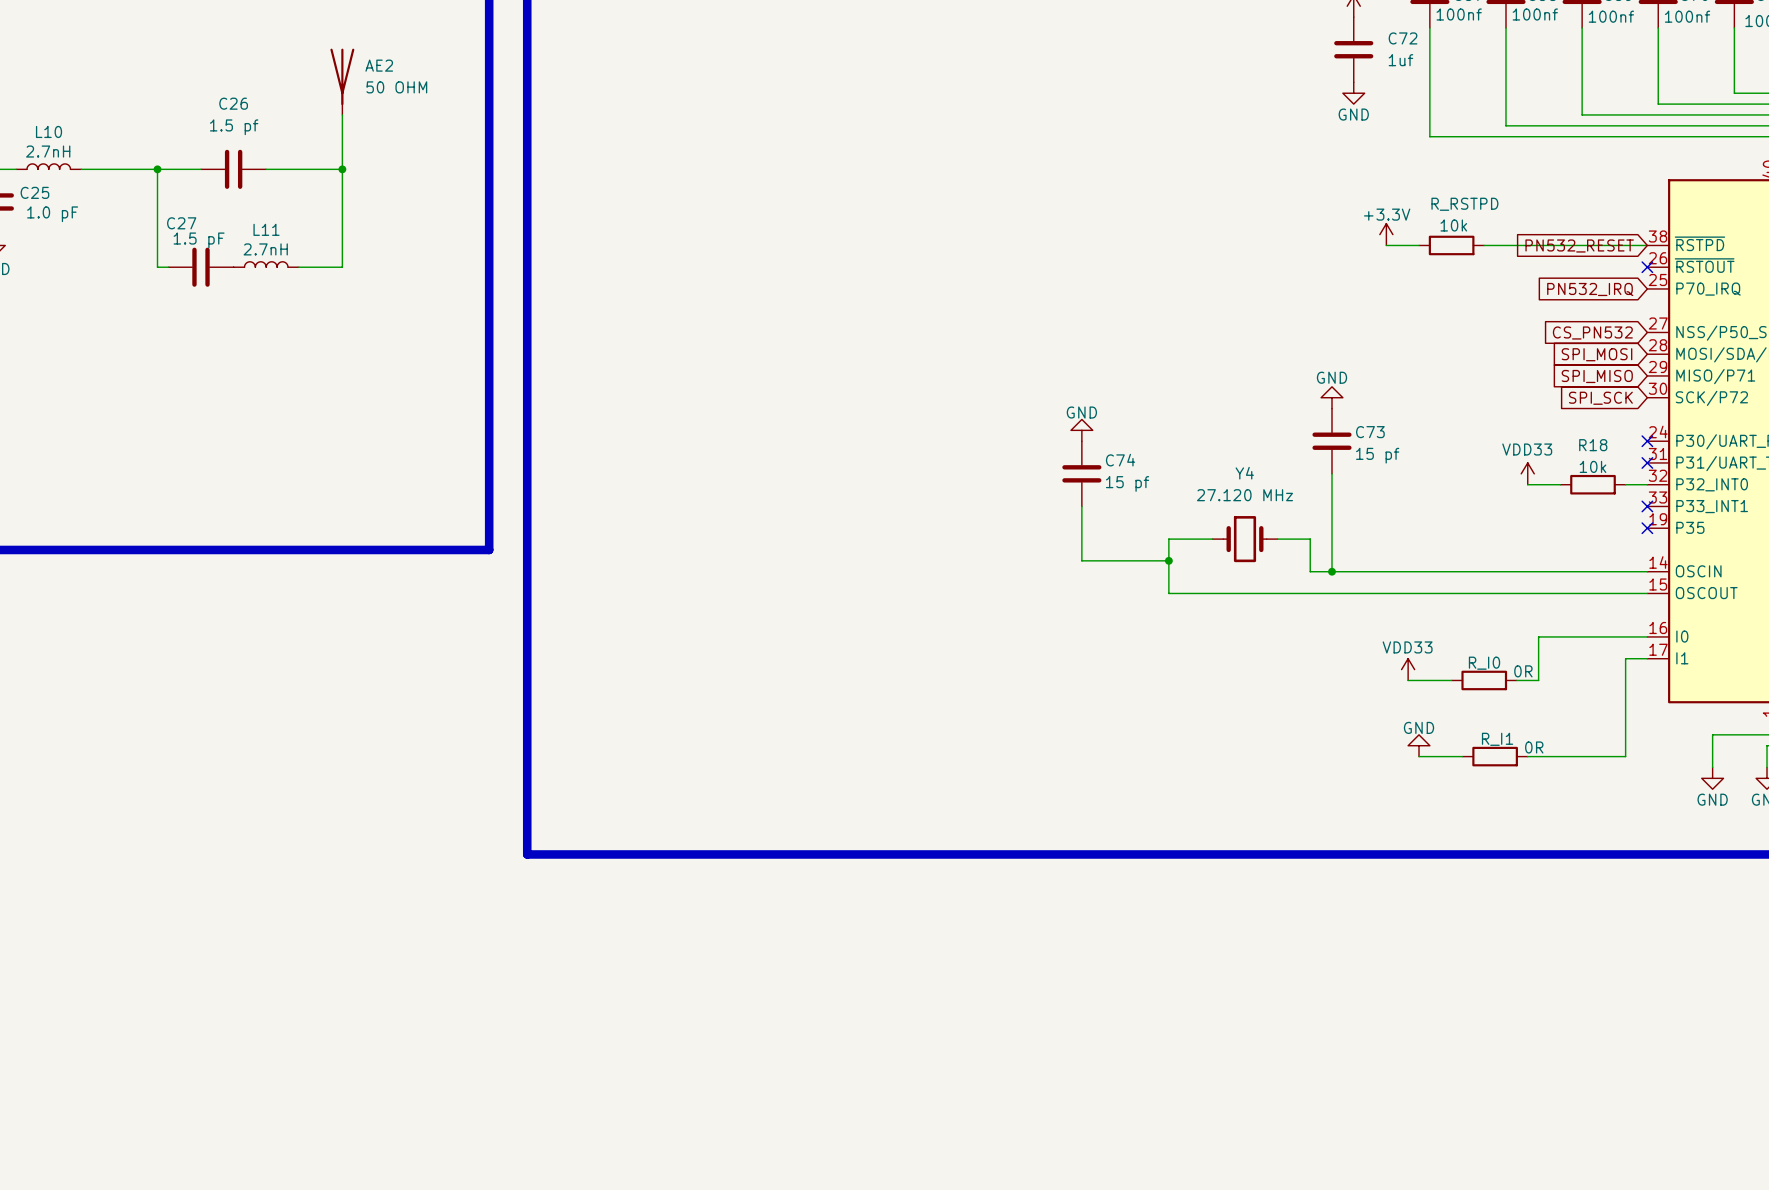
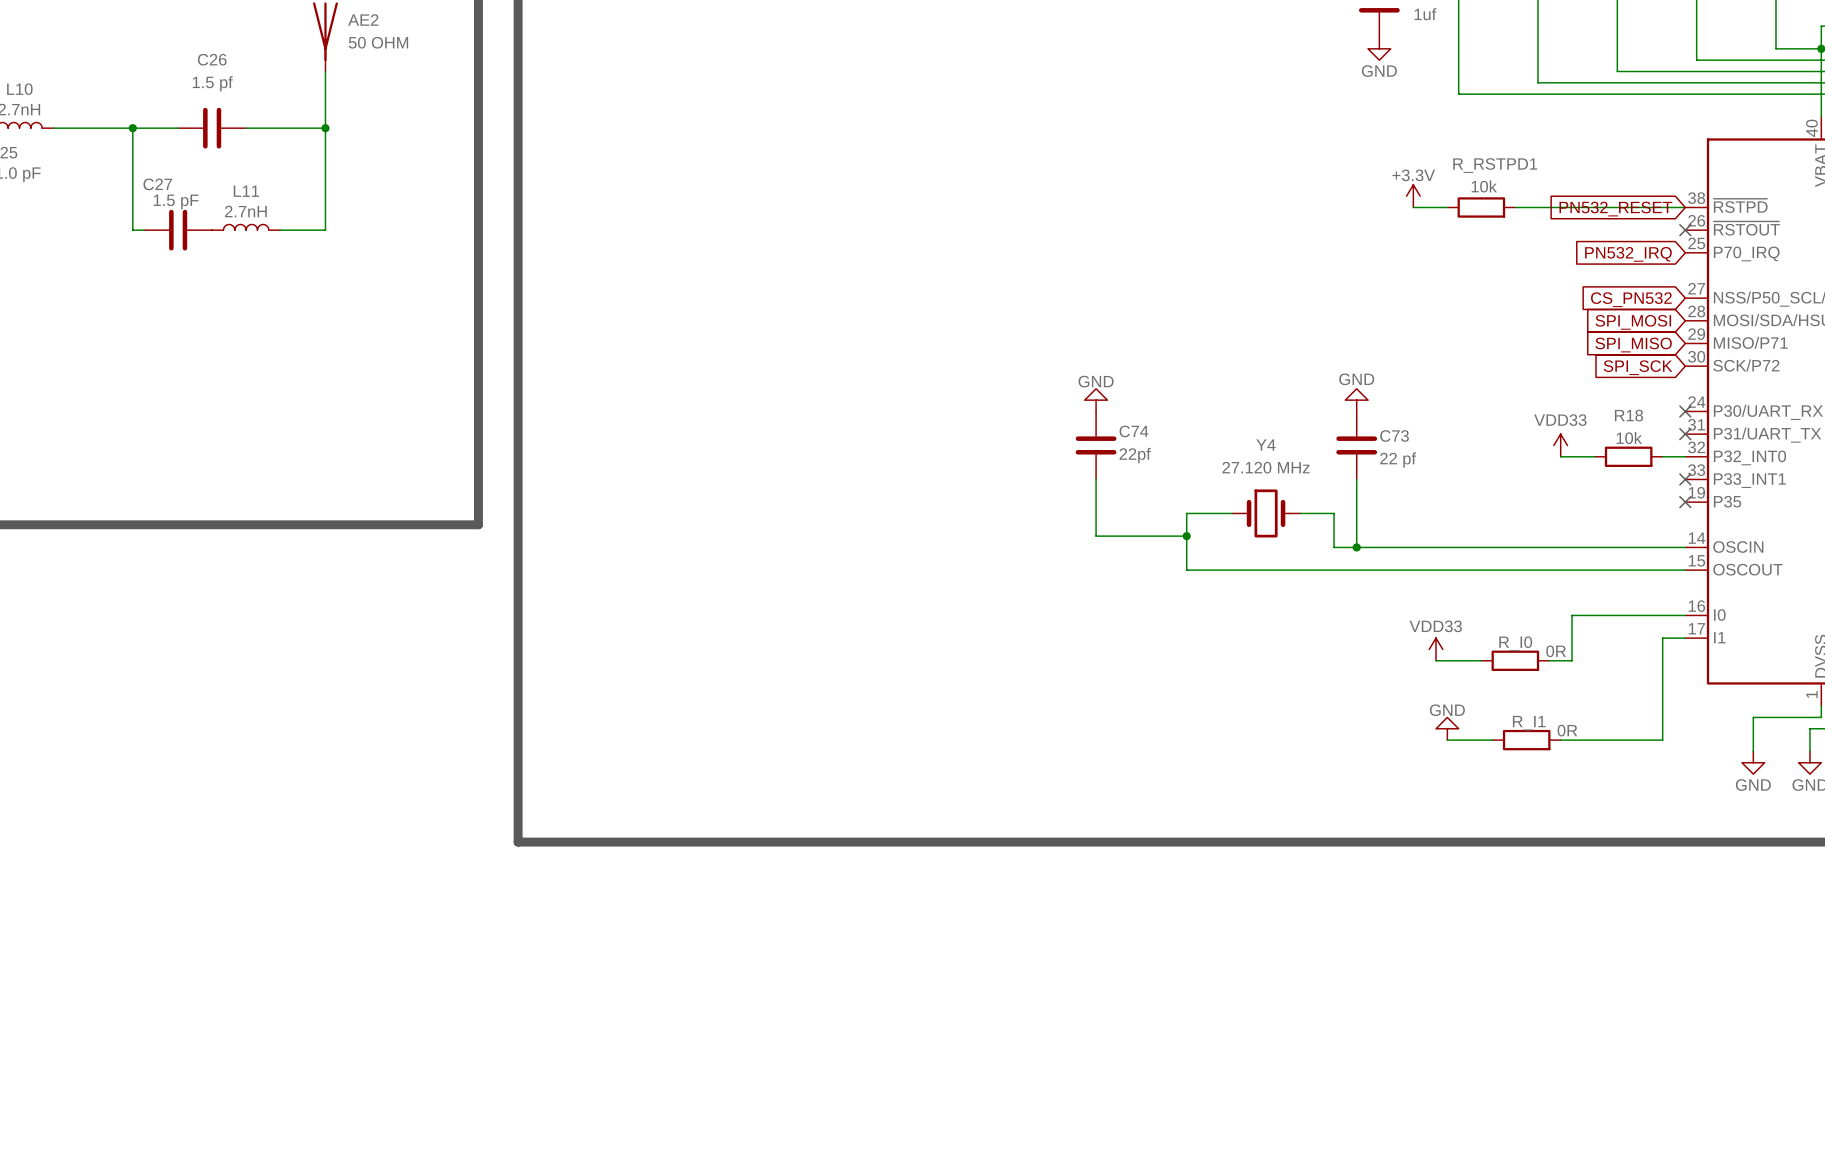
R_RSTPD name: R_RSTPD (1464, 204) -> R_RSTPD1 (1495, 165)
power symbol position: GND (1332, 397) -> GND (1356, 400)
C73 position: (1332, 441) -> (1356, 445)
C73 value: 15 pf (1377, 455) -> 22 pf (1398, 460)
C74 value: 15 pf (1127, 483) -> 22pf (1135, 455)

